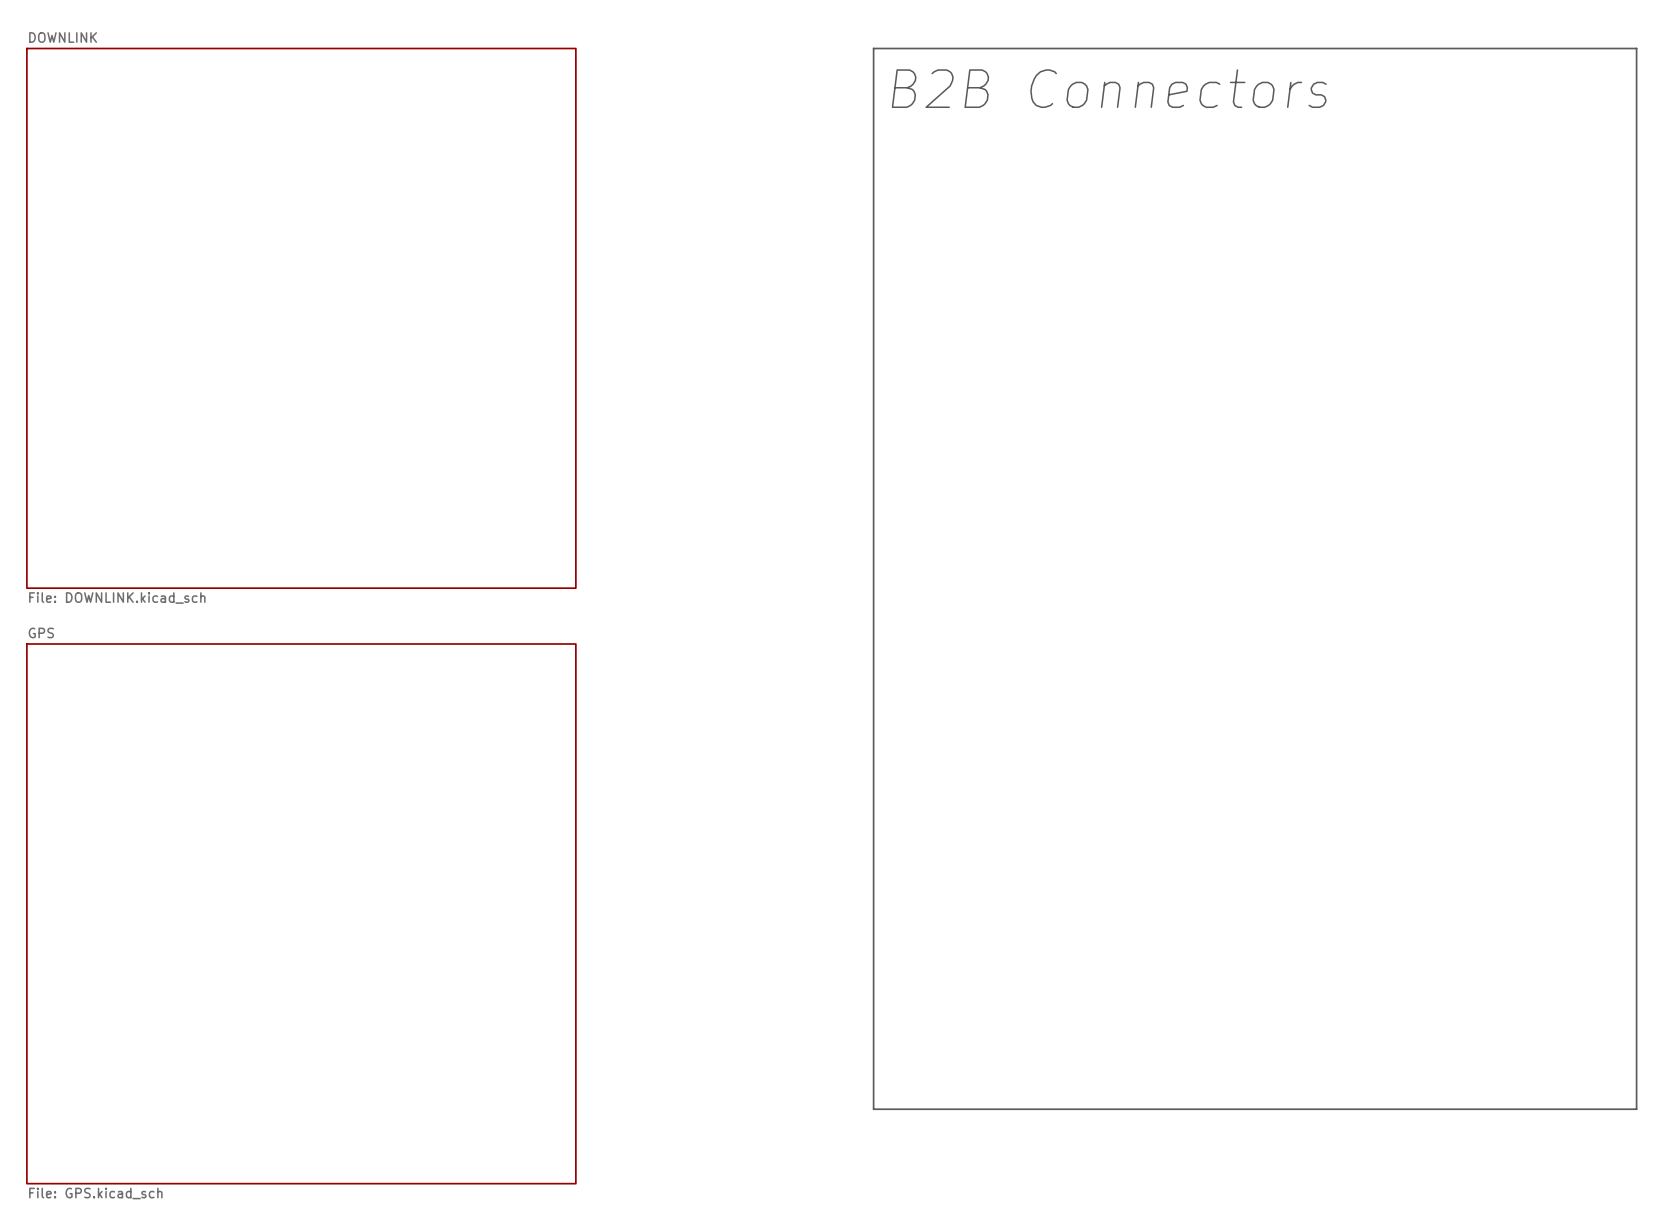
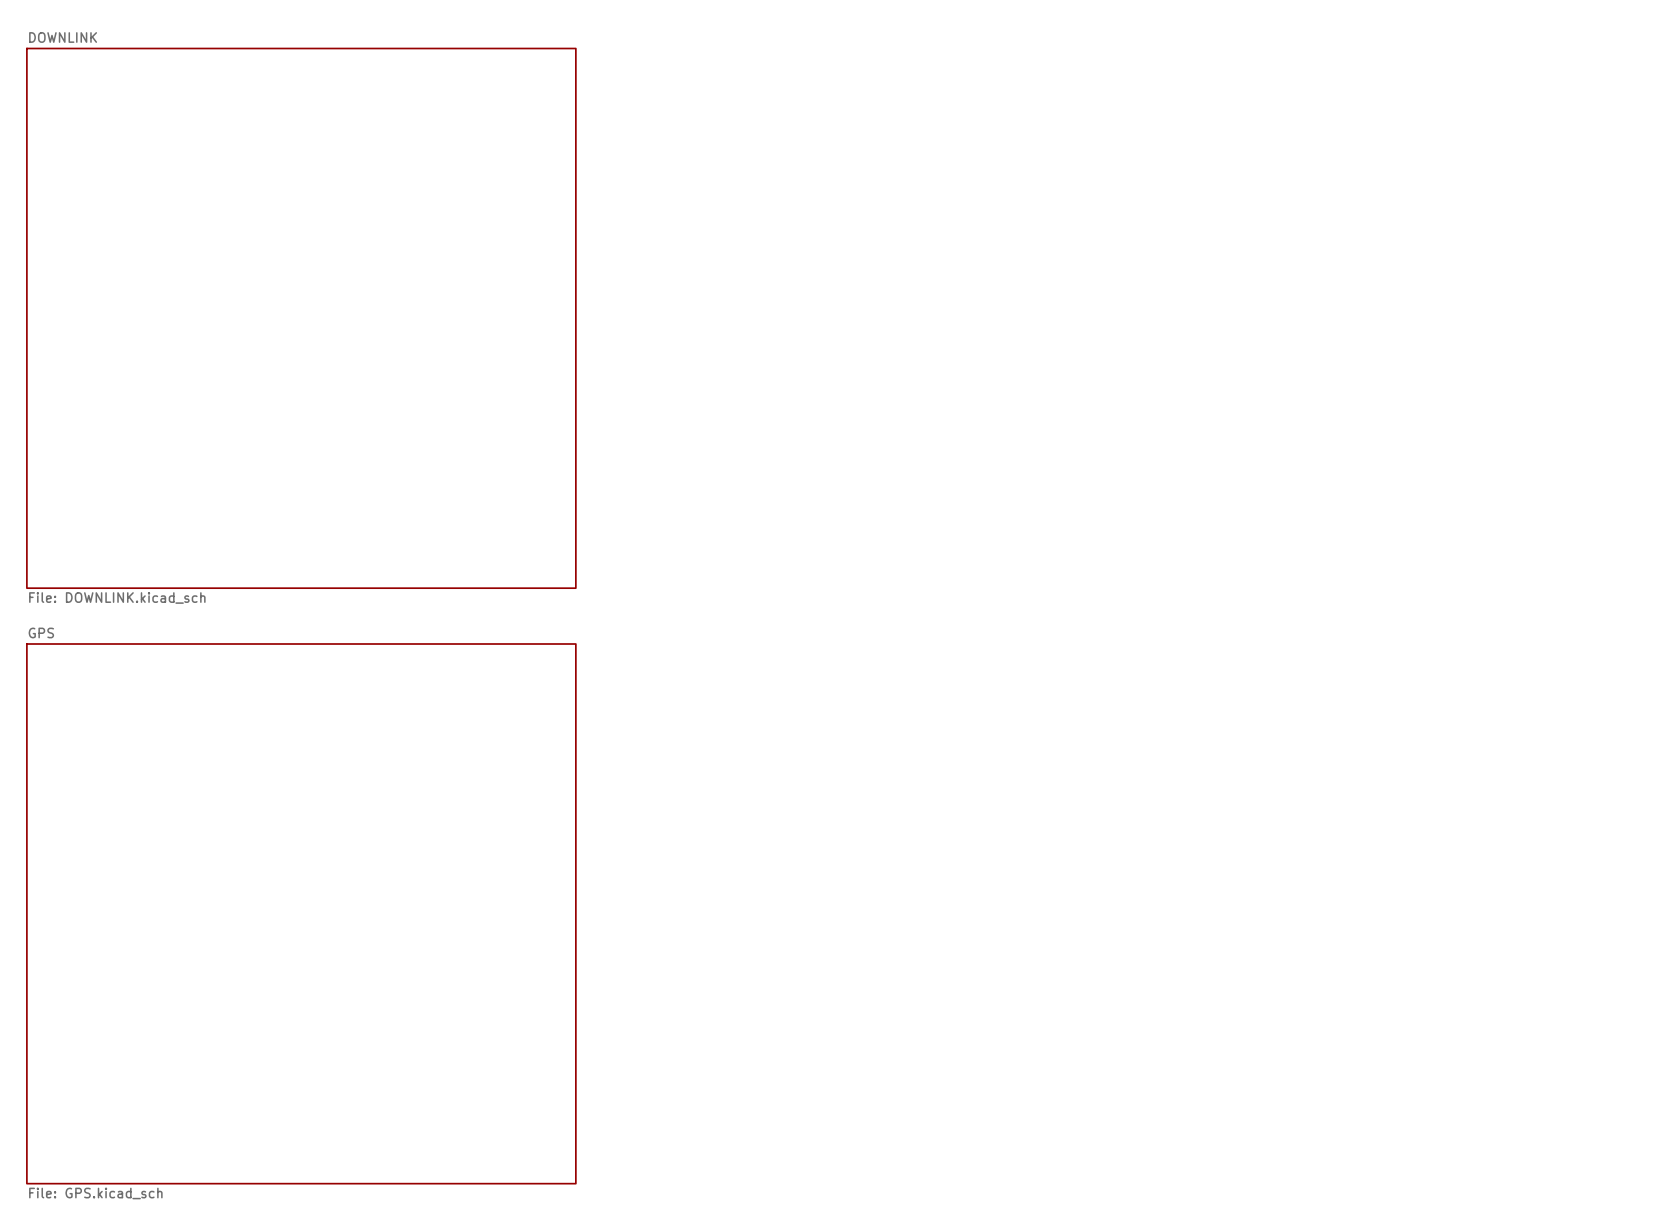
line: (873, 48) (873, 1109) (1636, 1109) (1636, 48) (873, 48) -> none
text: B2B Connectors (1109, 88) -> none

